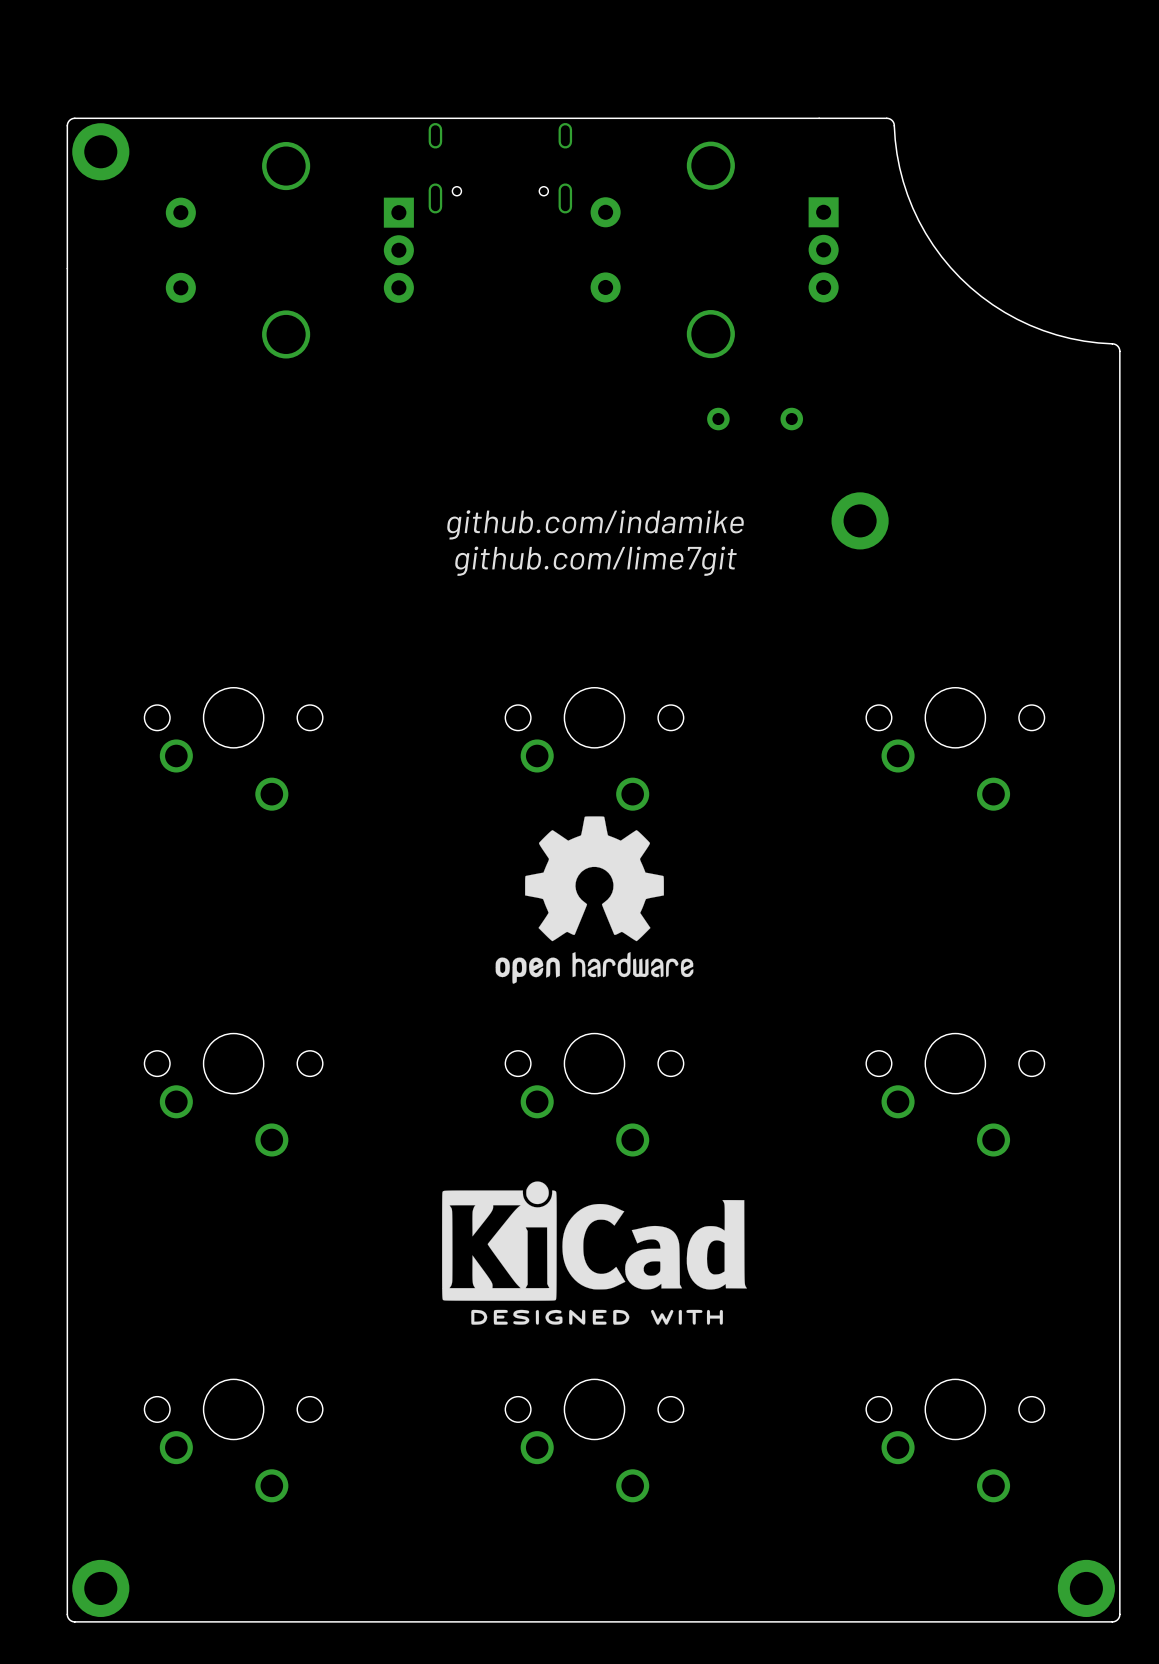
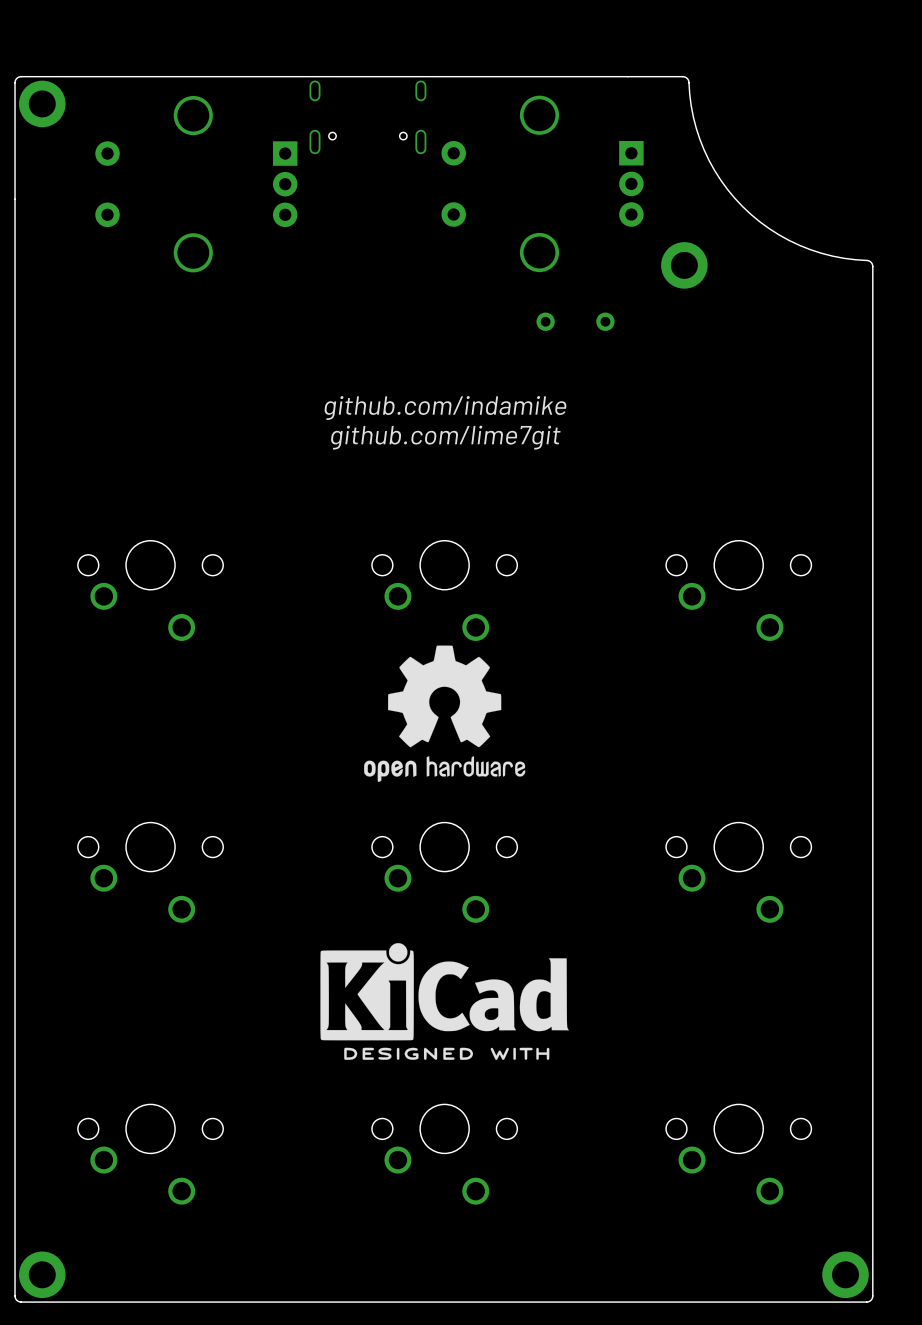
part position: (860, 520) -> (684, 265)

